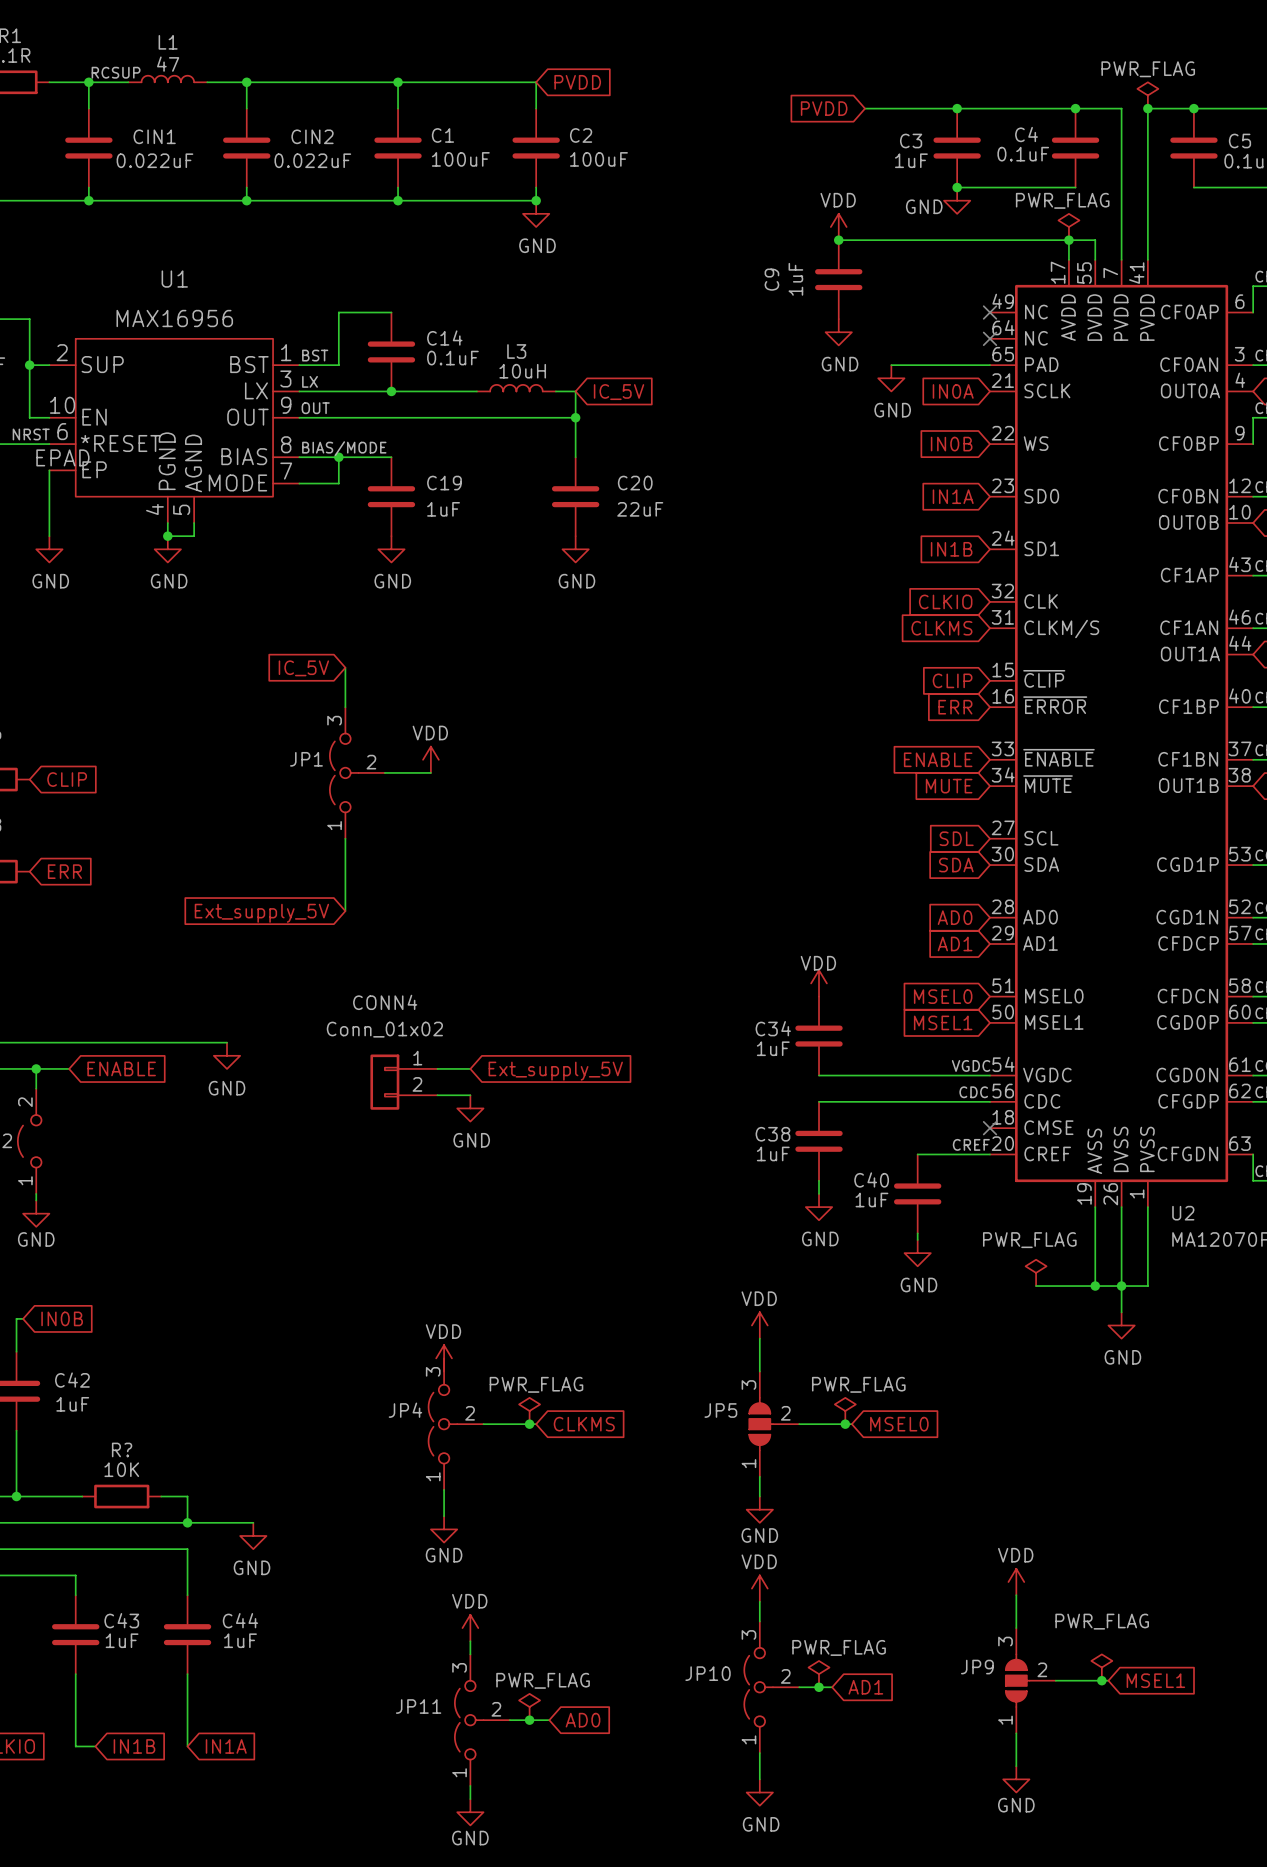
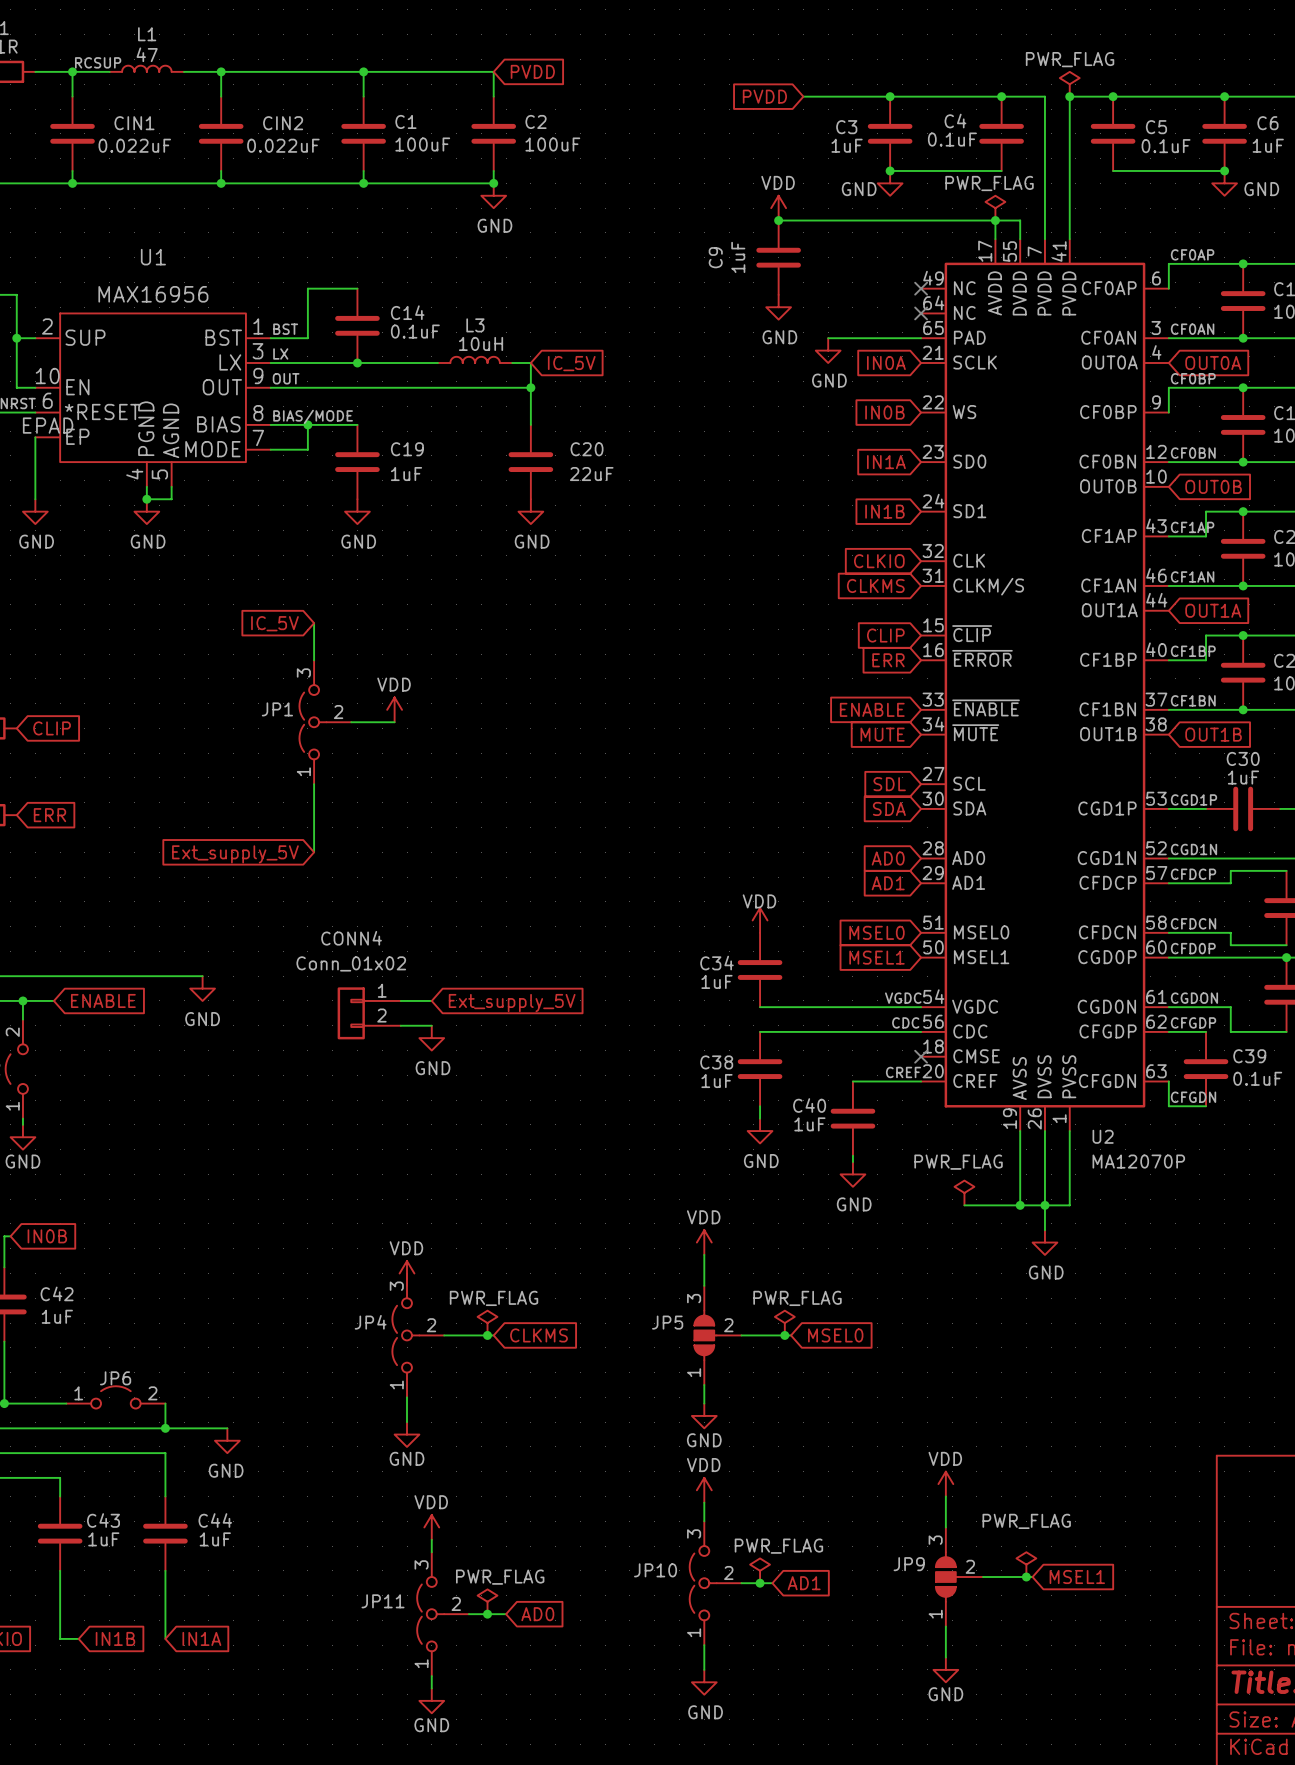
JP6: none -> (115, 1397)
R?: 10K (121, 1496) -> none

